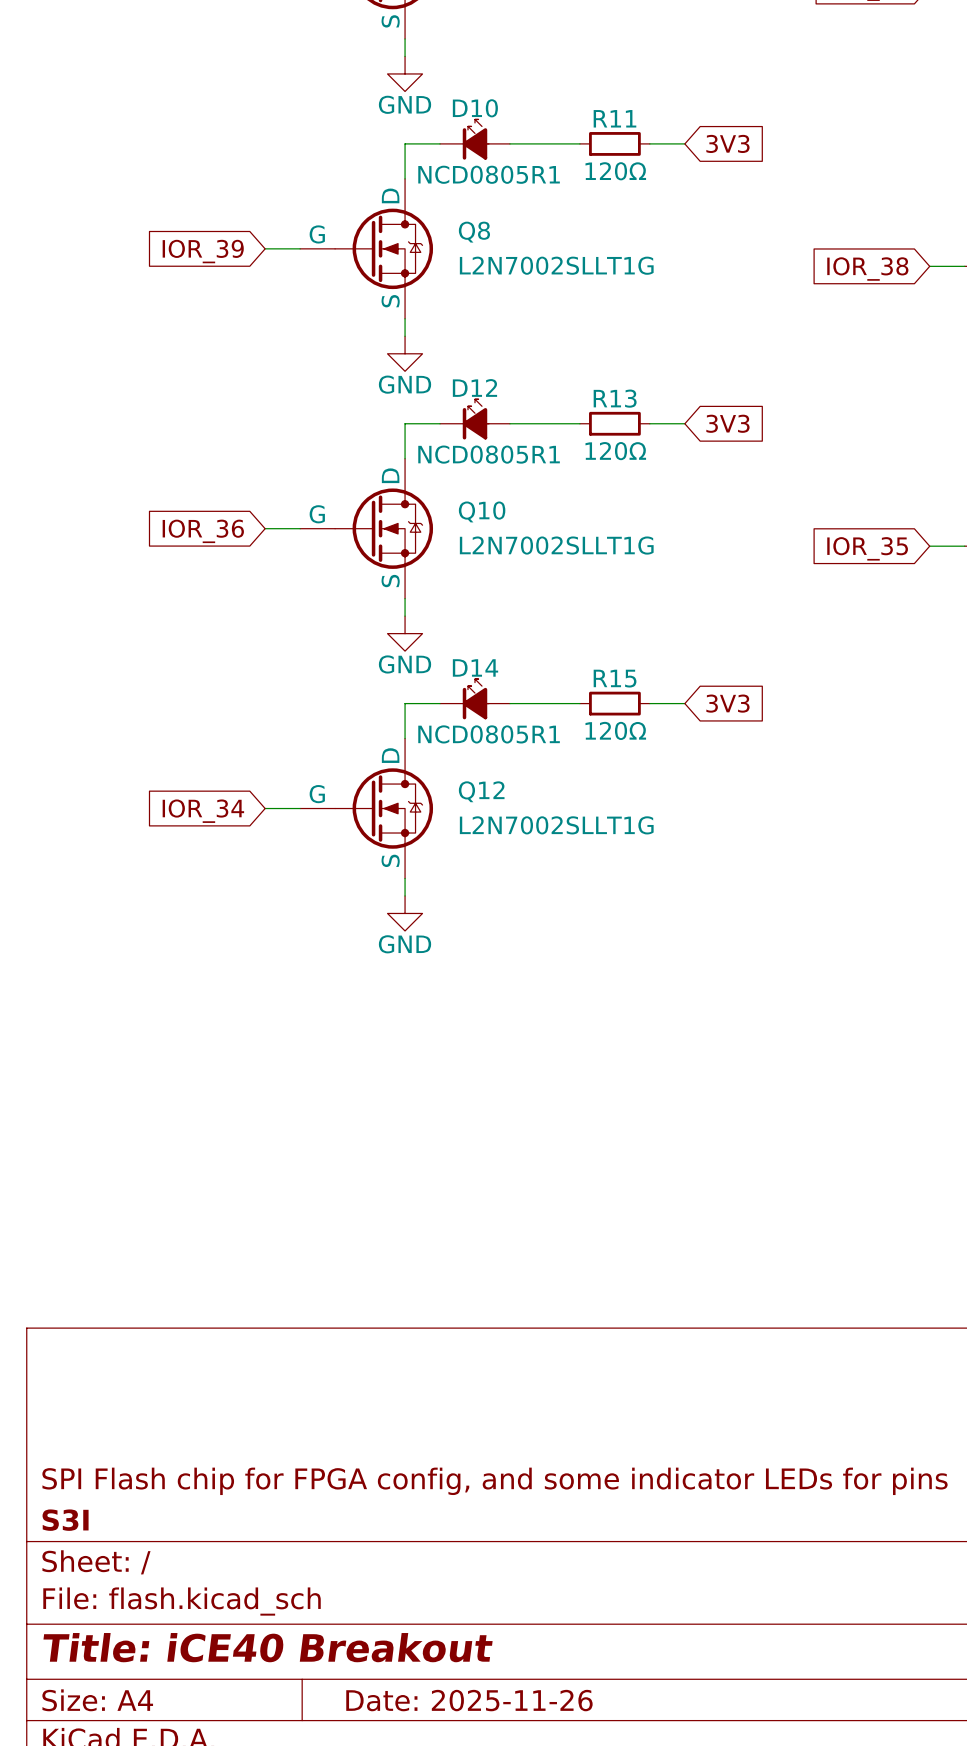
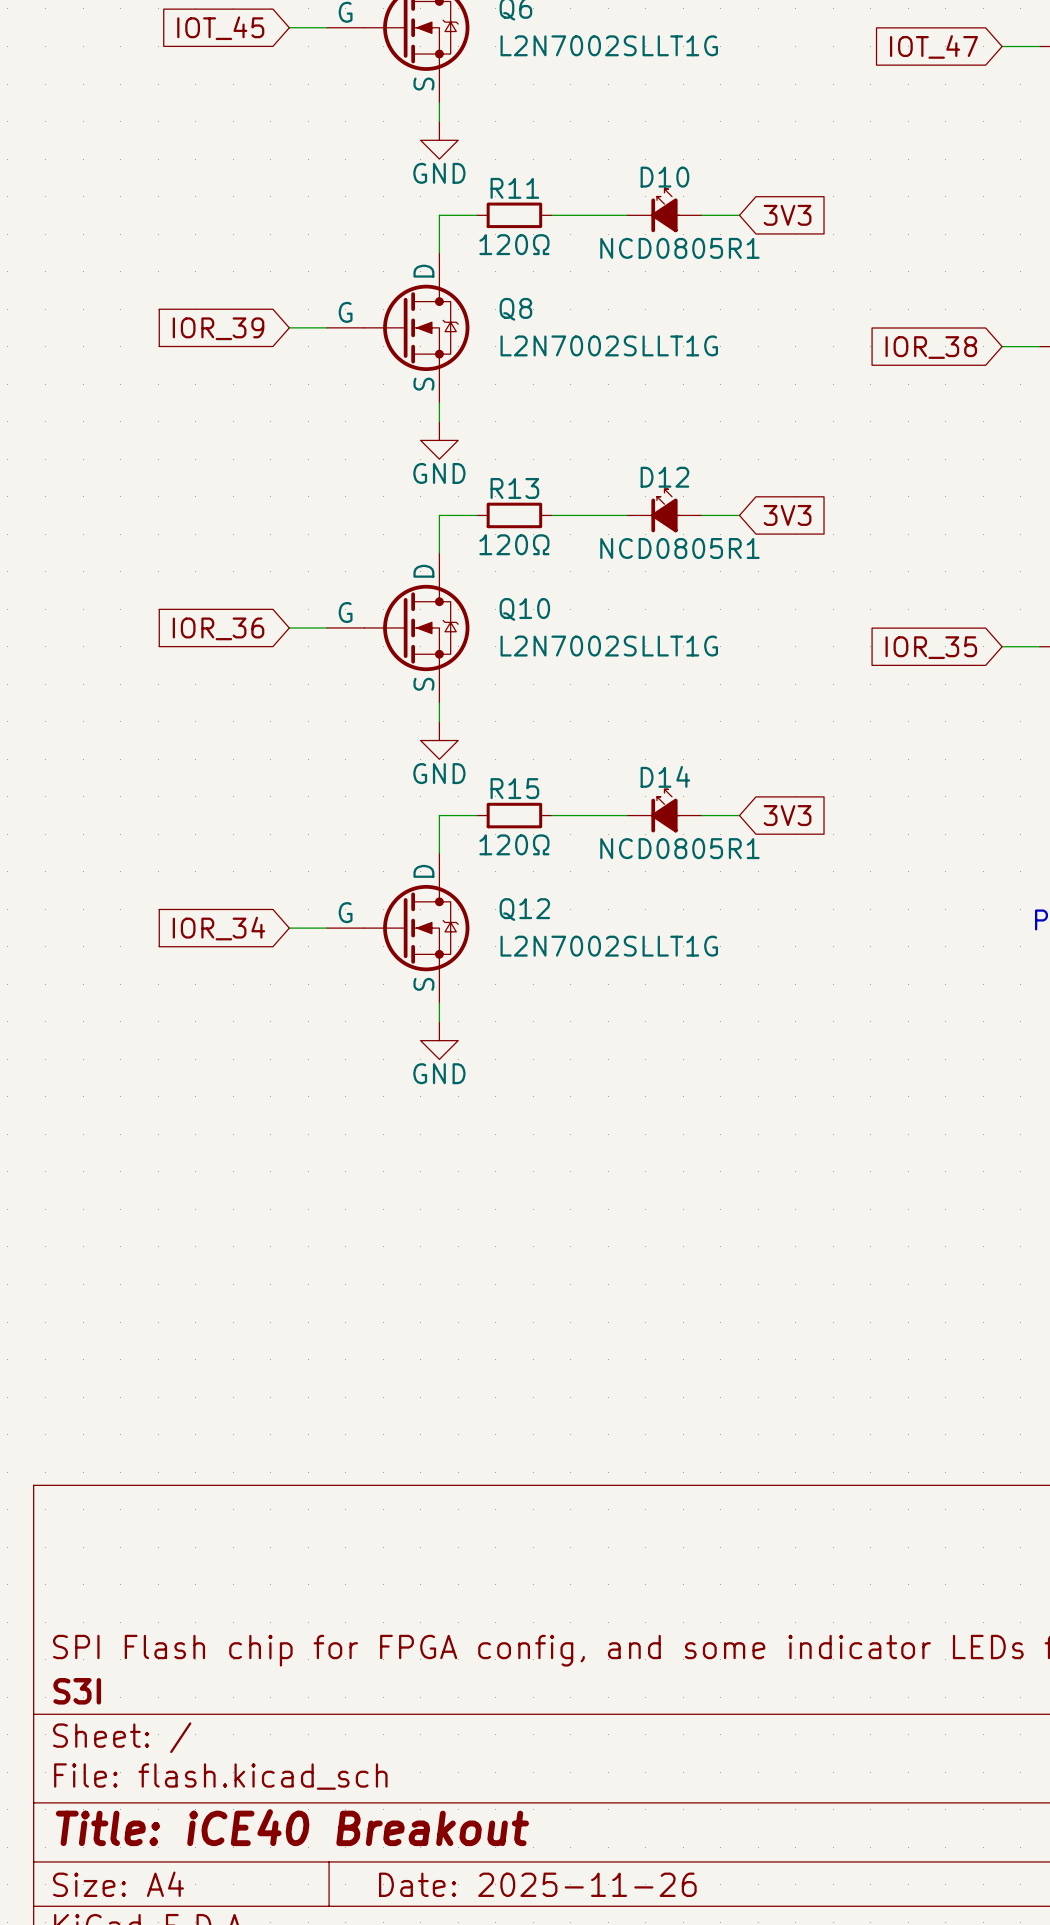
D10 position: (475, 139) -> (664, 210)
R11 position: (614, 143) -> (514, 215)
D12 position: (475, 419) -> (664, 510)
R13 position: (614, 423) -> (514, 515)
D14 position: (475, 699) -> (664, 810)
R15 position: (614, 703) -> (514, 815)

